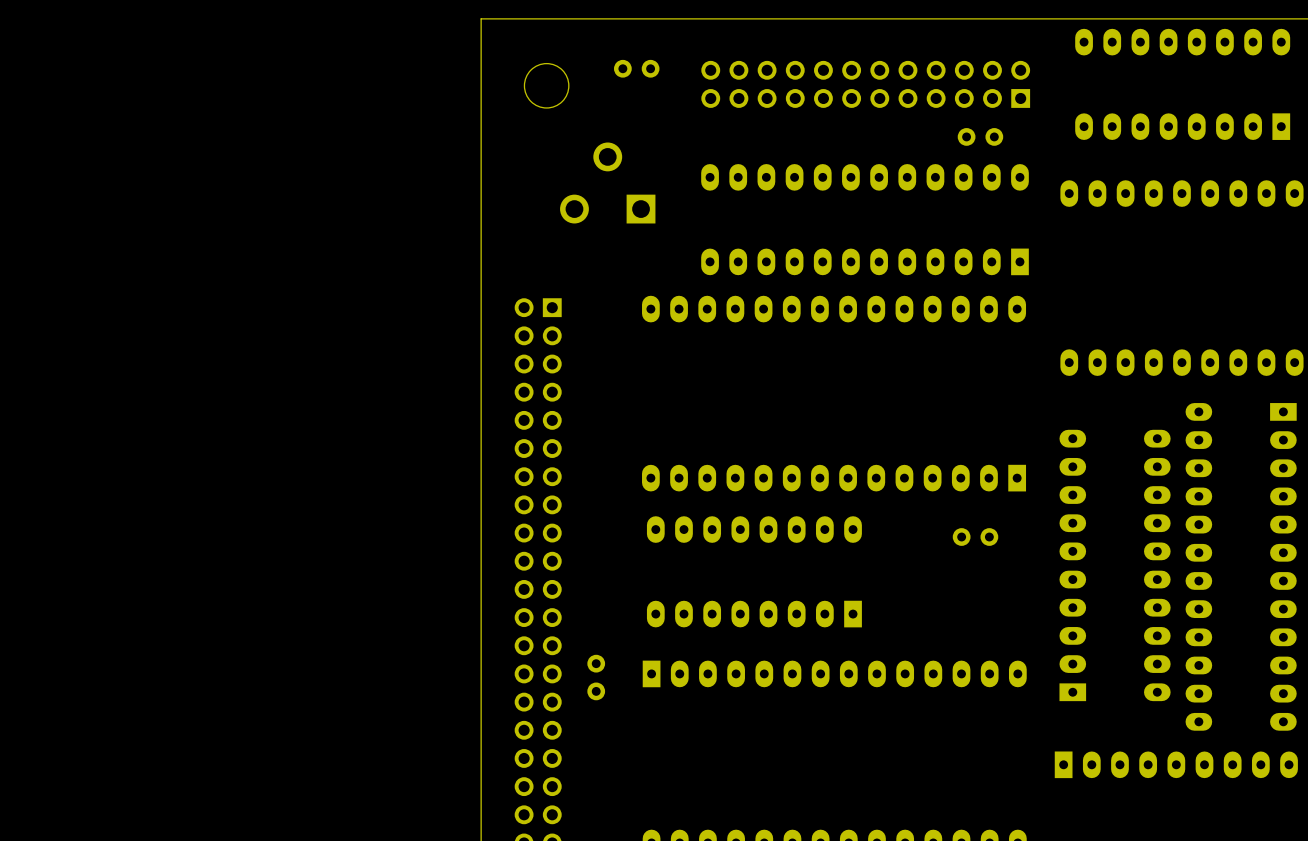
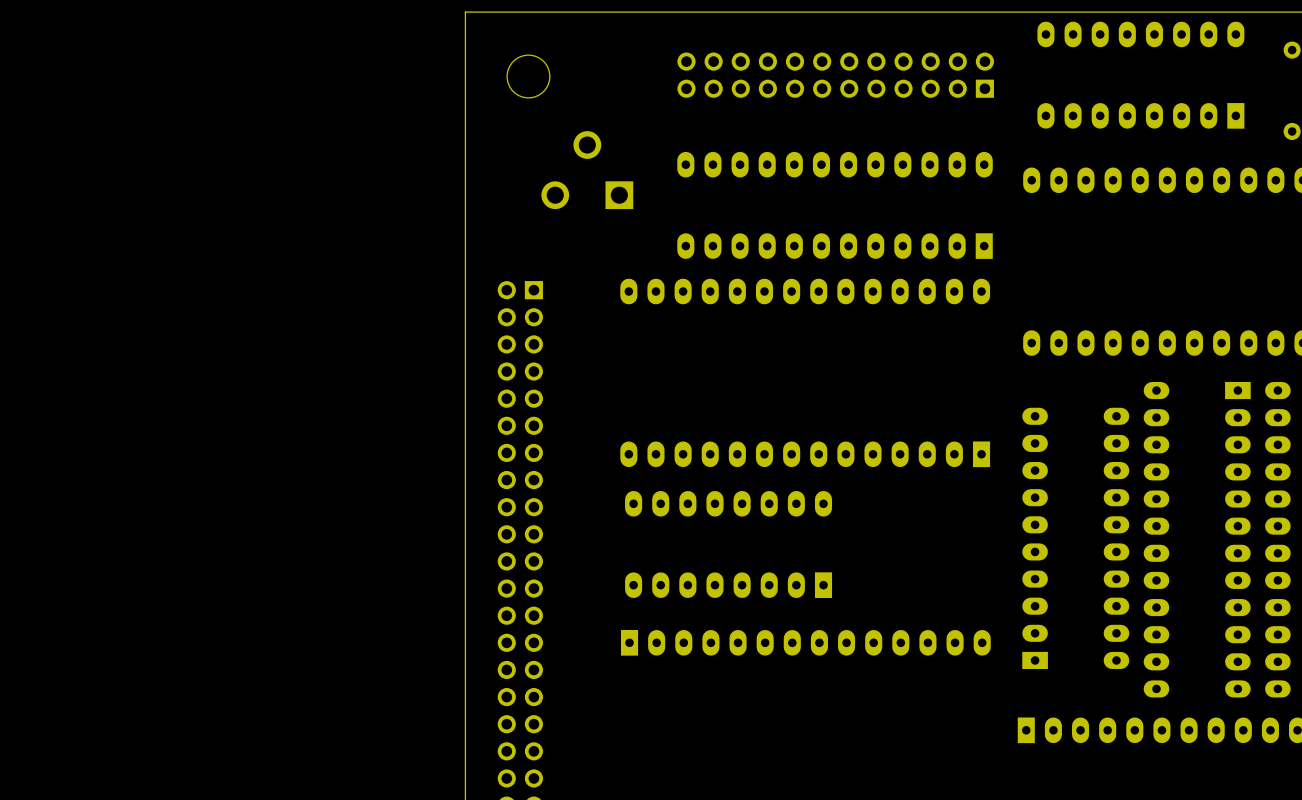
part: (636, 68) -> none
part: (980, 136) -> none
part: (975, 537) -> none
part: (596, 677) -> none

